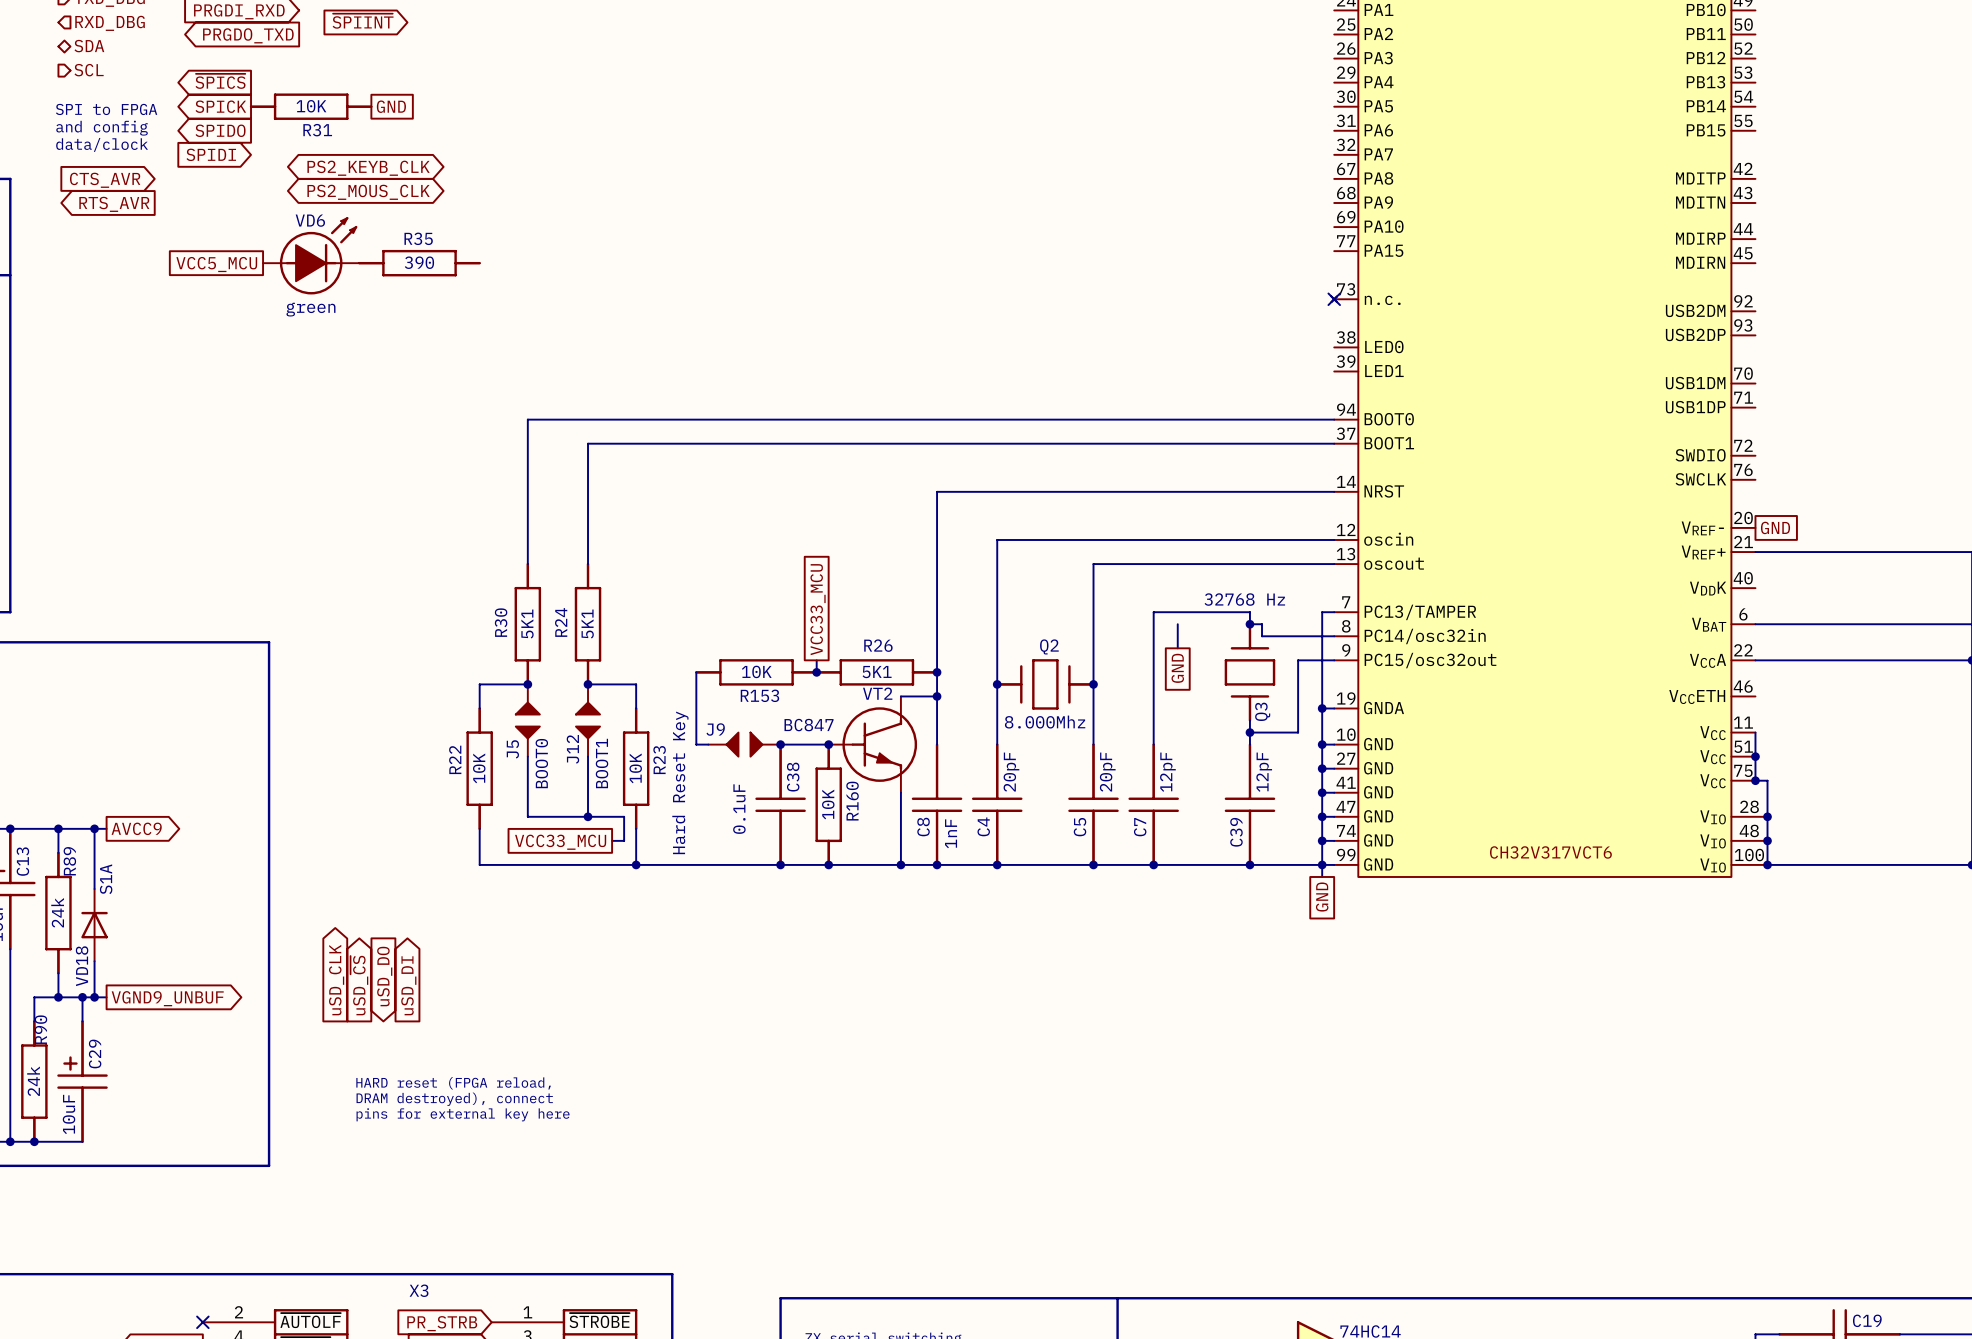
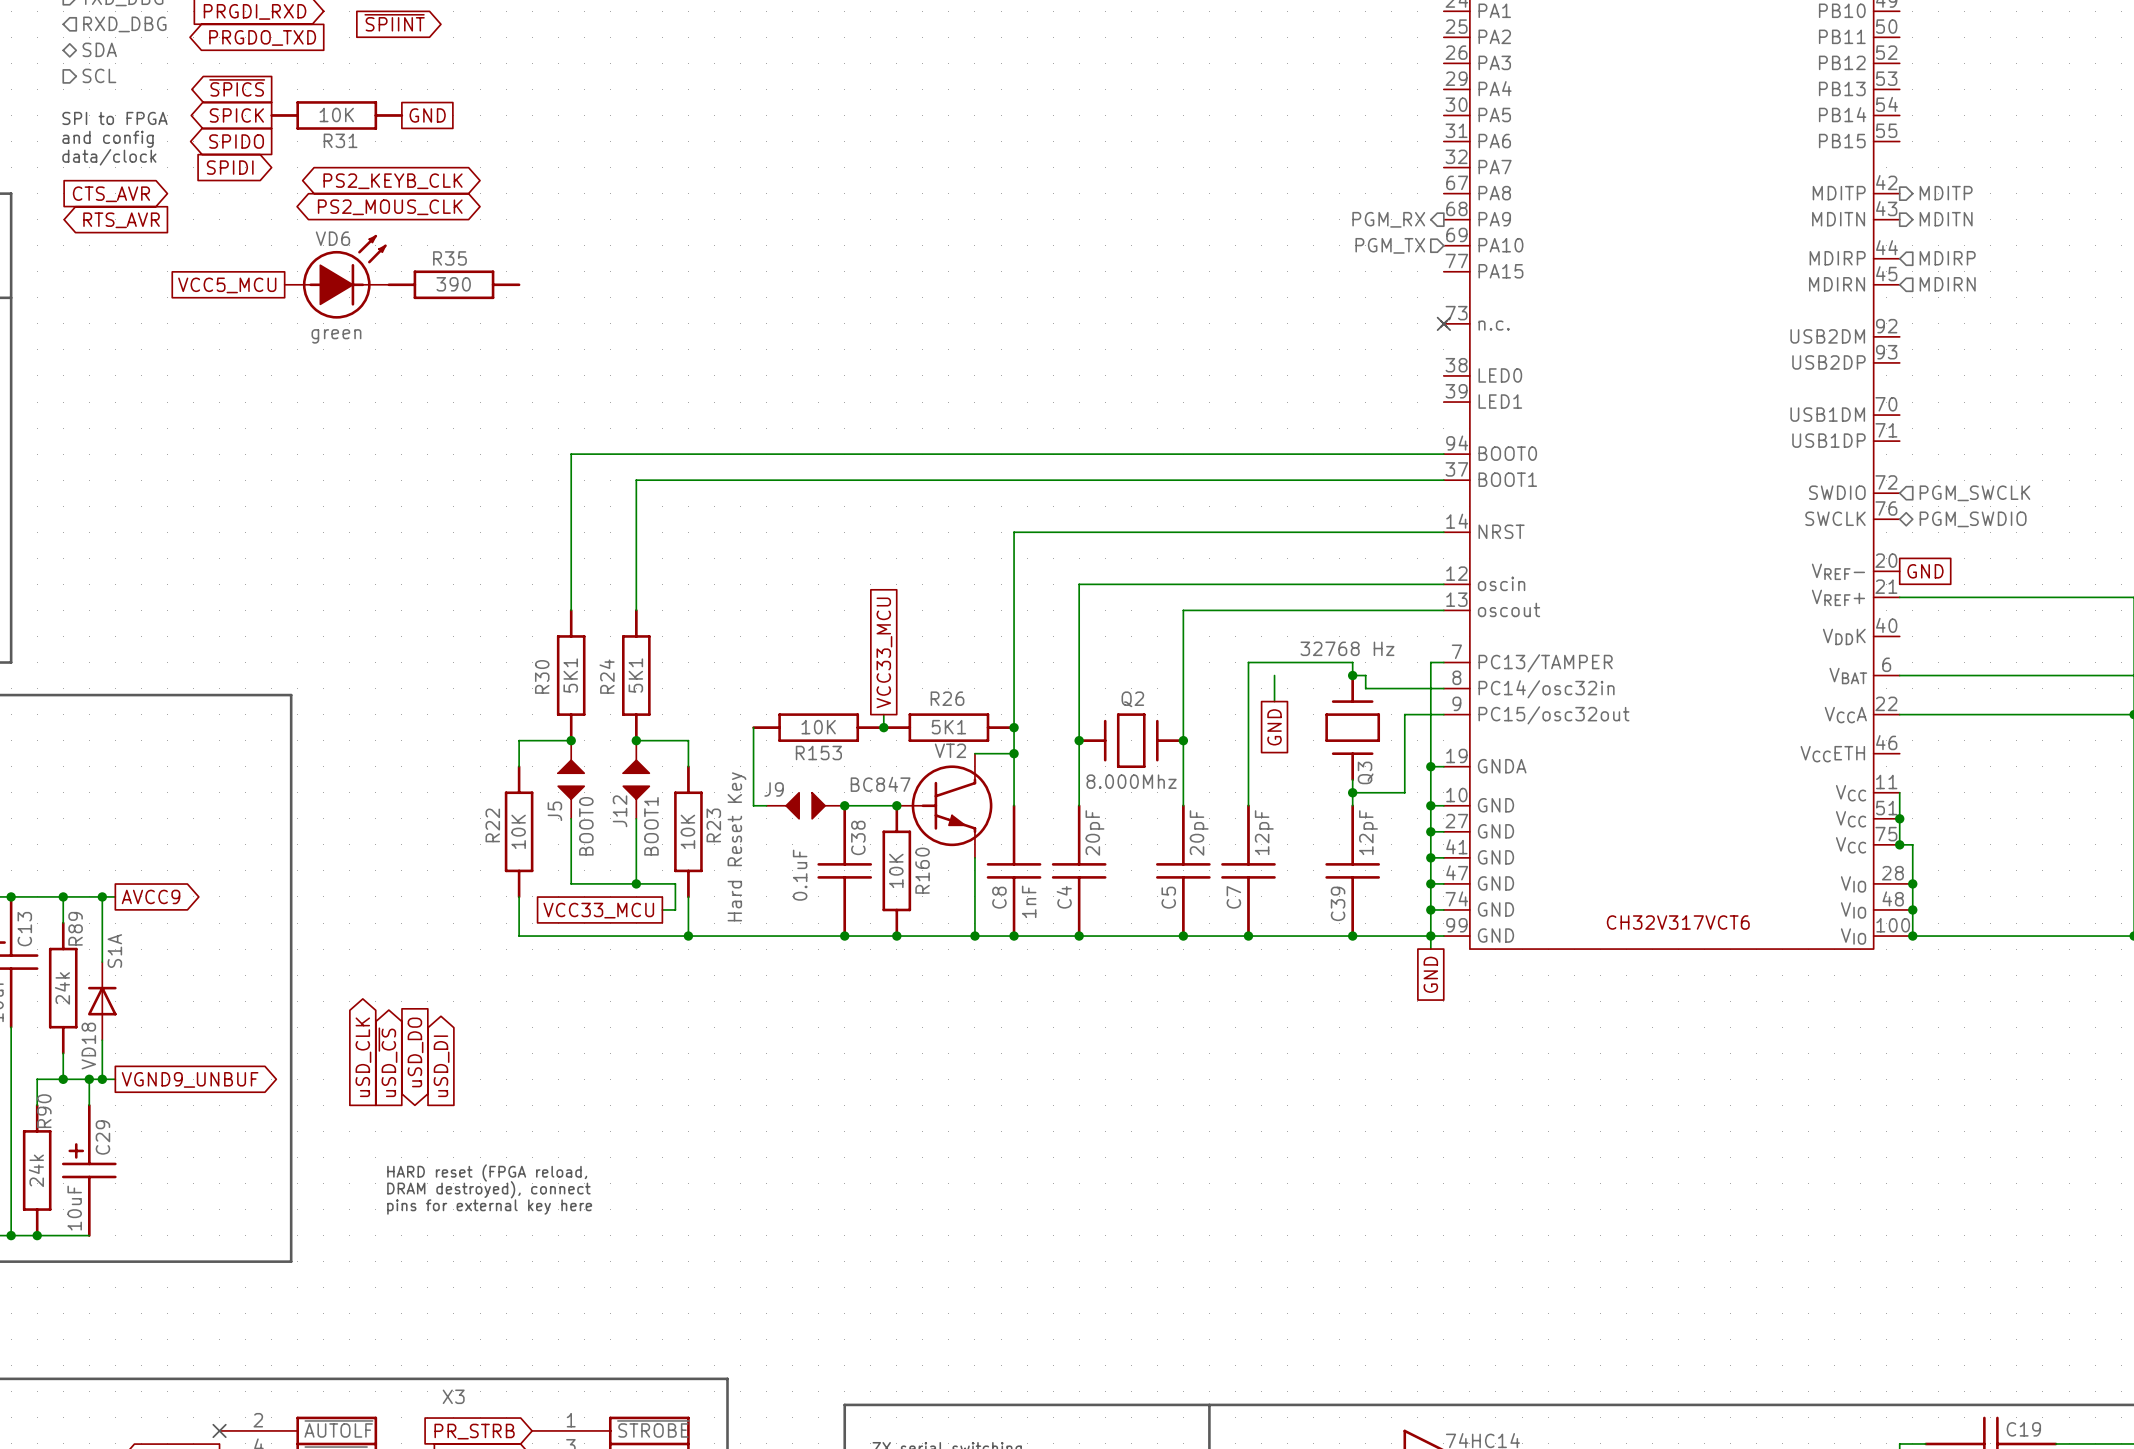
hierarchical label: none -> MDITP (1946, 193)
hierarchical label: none -> MDITN (1946, 219)
hierarchical label: none -> PGM_RX (1388, 219)
hierarchical label: none -> PGM_TX (1390, 245)
hierarchical label: none -> MDIRP (1947, 258)
hierarchical label: none -> MDIRN (1947, 284)
hierarchical label: none -> PGM_SWCLK (1974, 493)
hierarchical label: none -> PGM_SWDIO (1973, 519)

